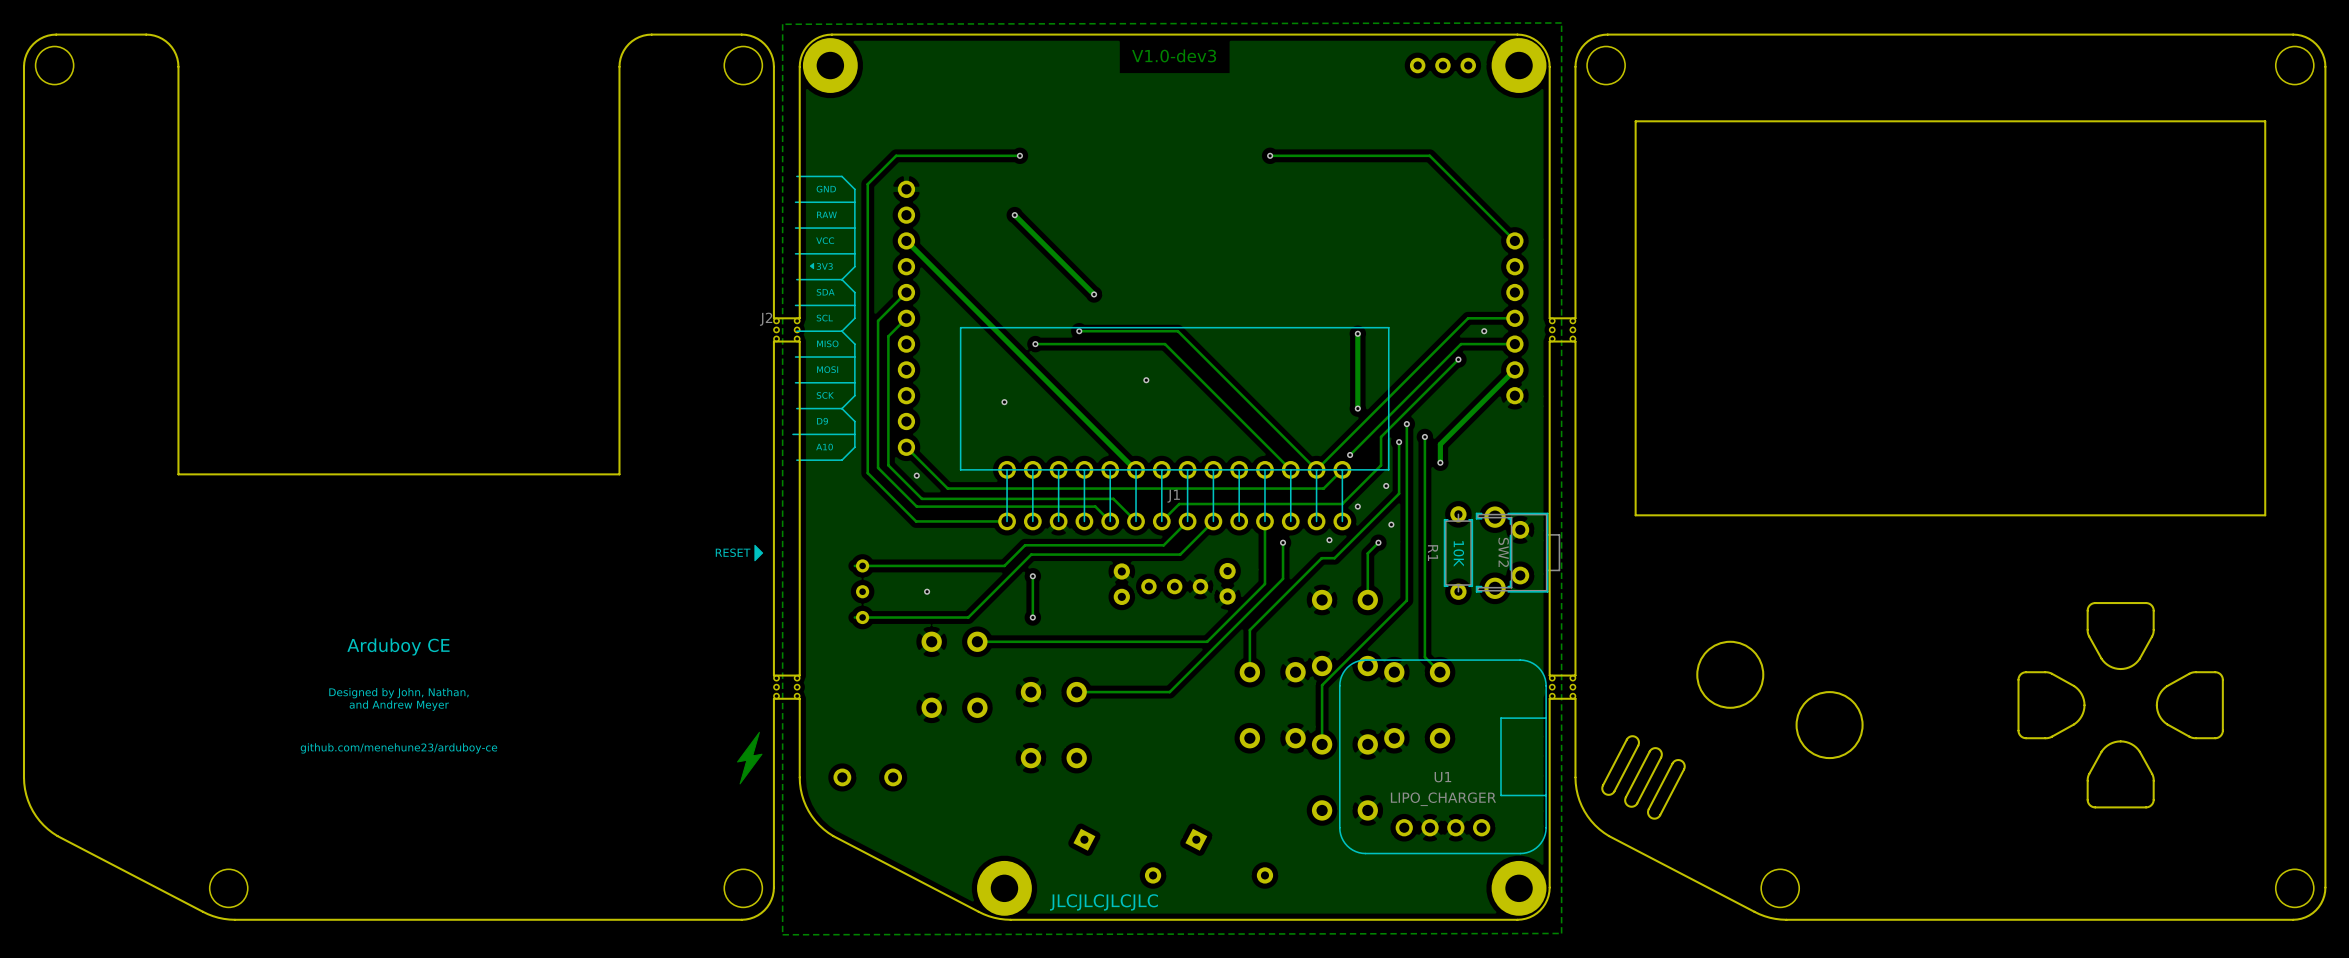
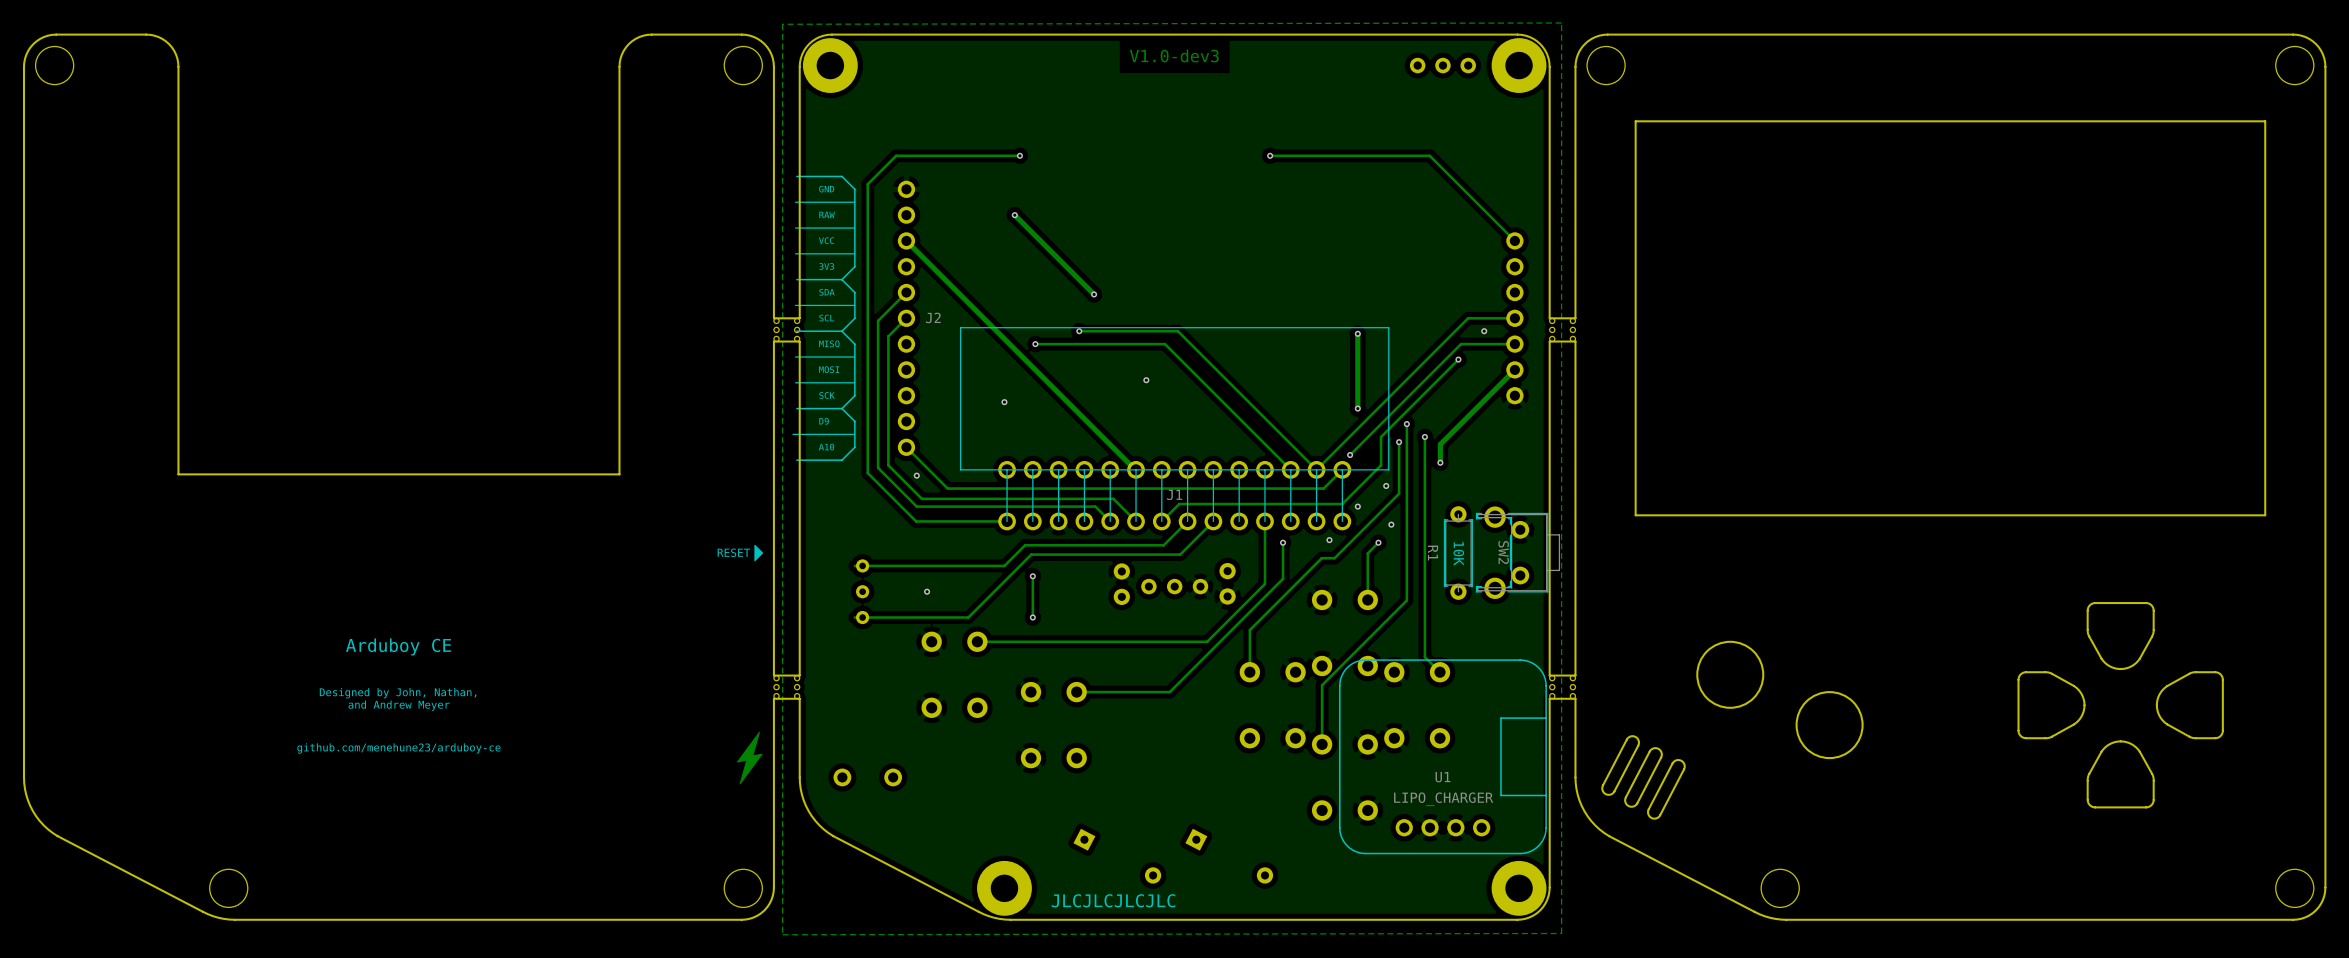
J2 footprint: [792, 175, 916, 461] -> [792, 175, 916, 461]
J2 name position: J2 (766, 319) -> J2 (933, 317)

